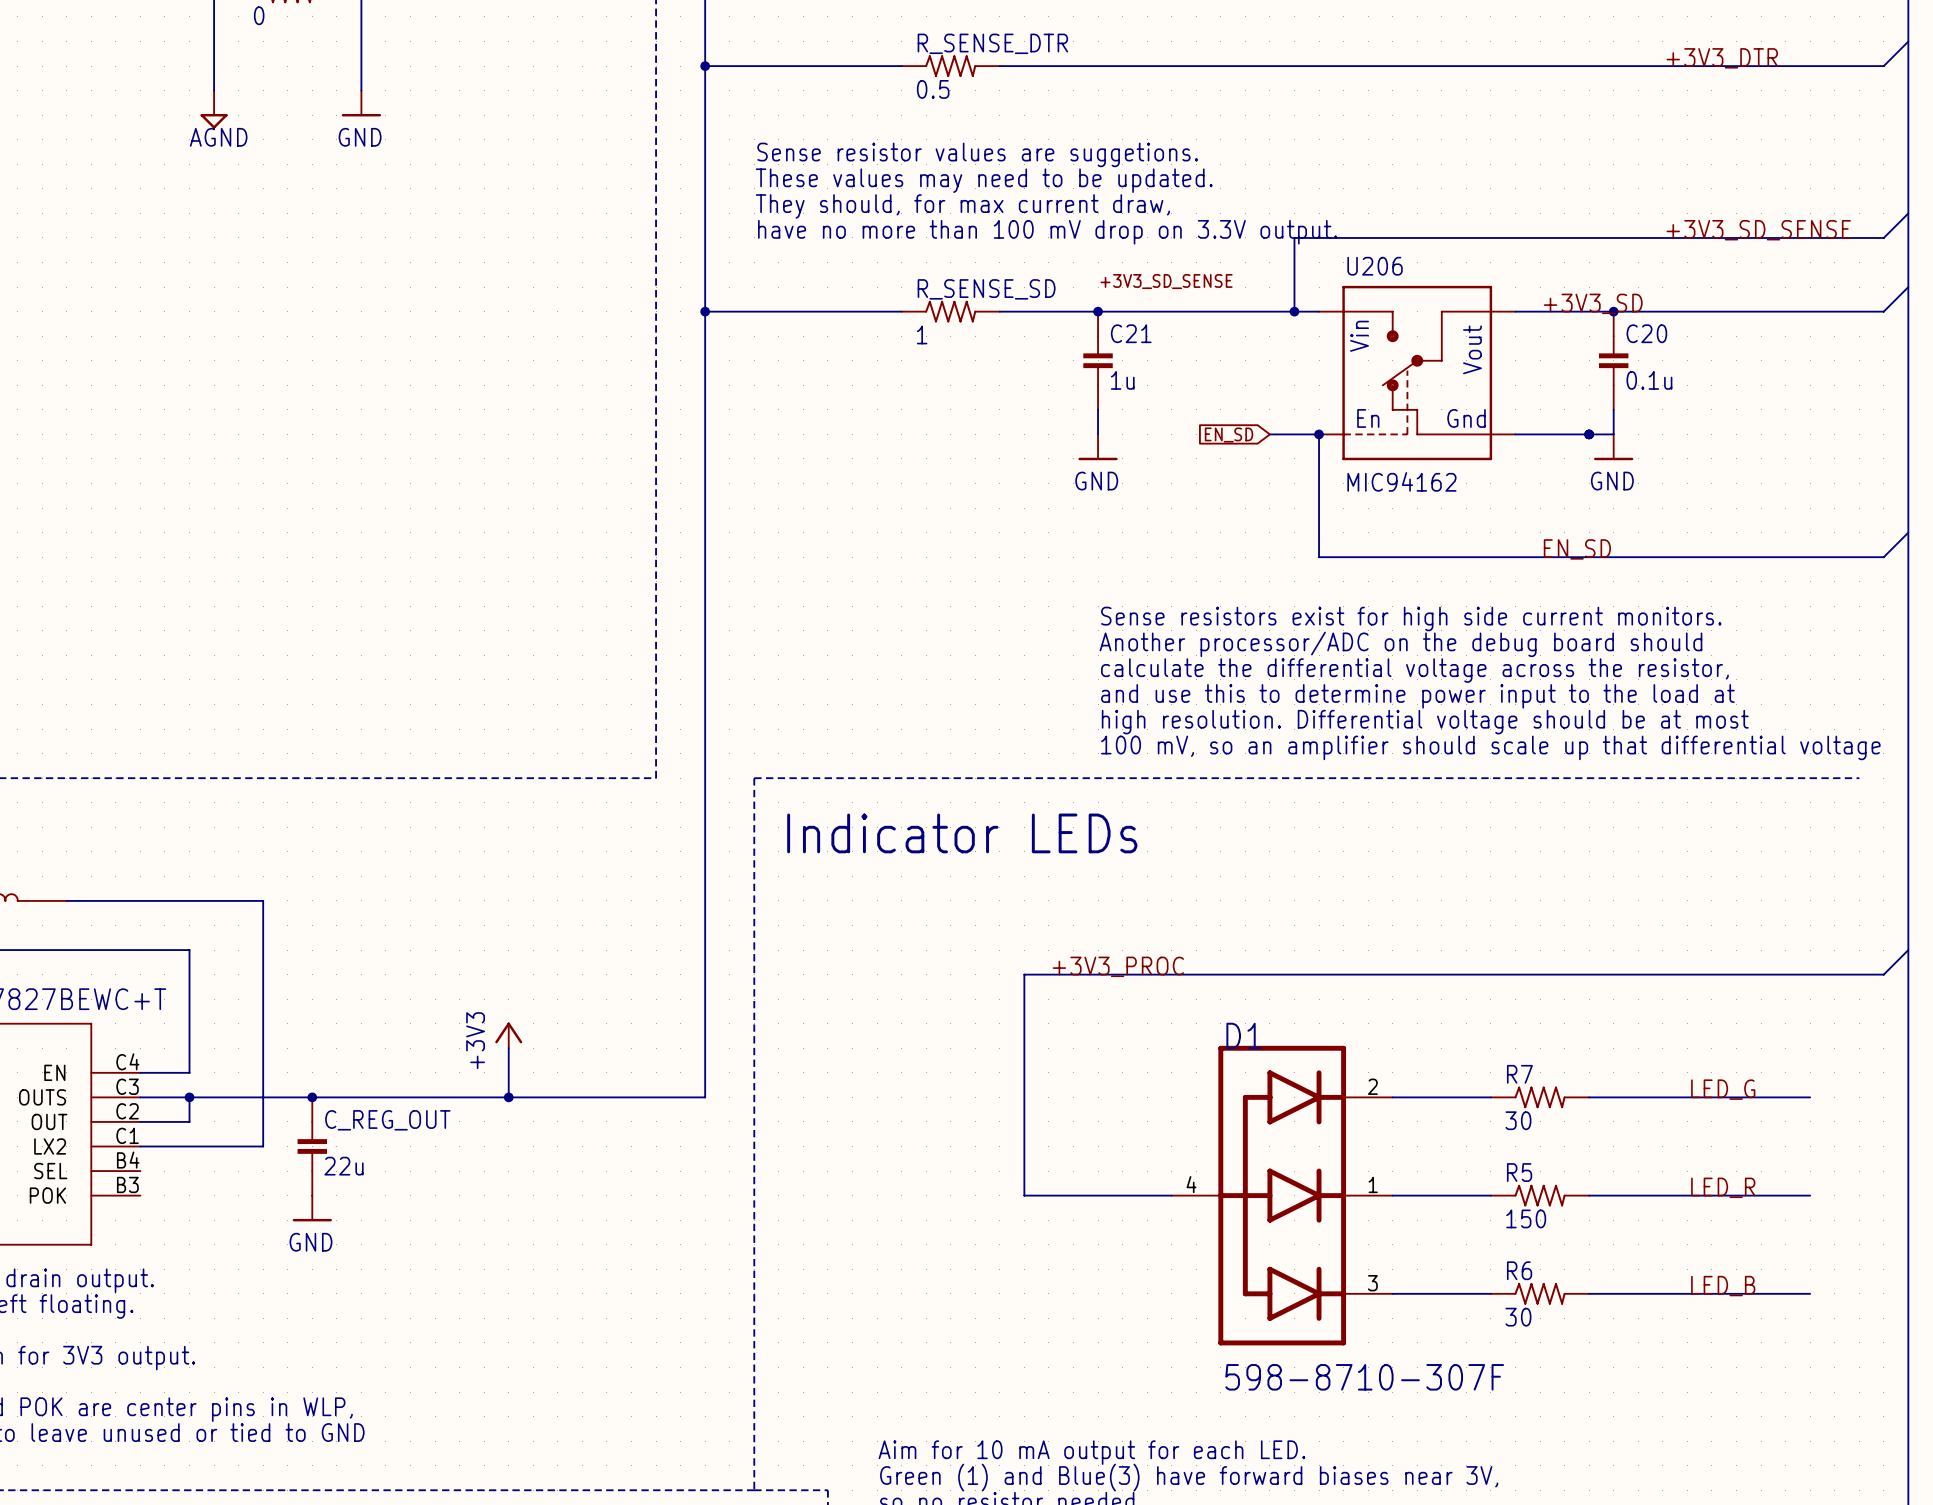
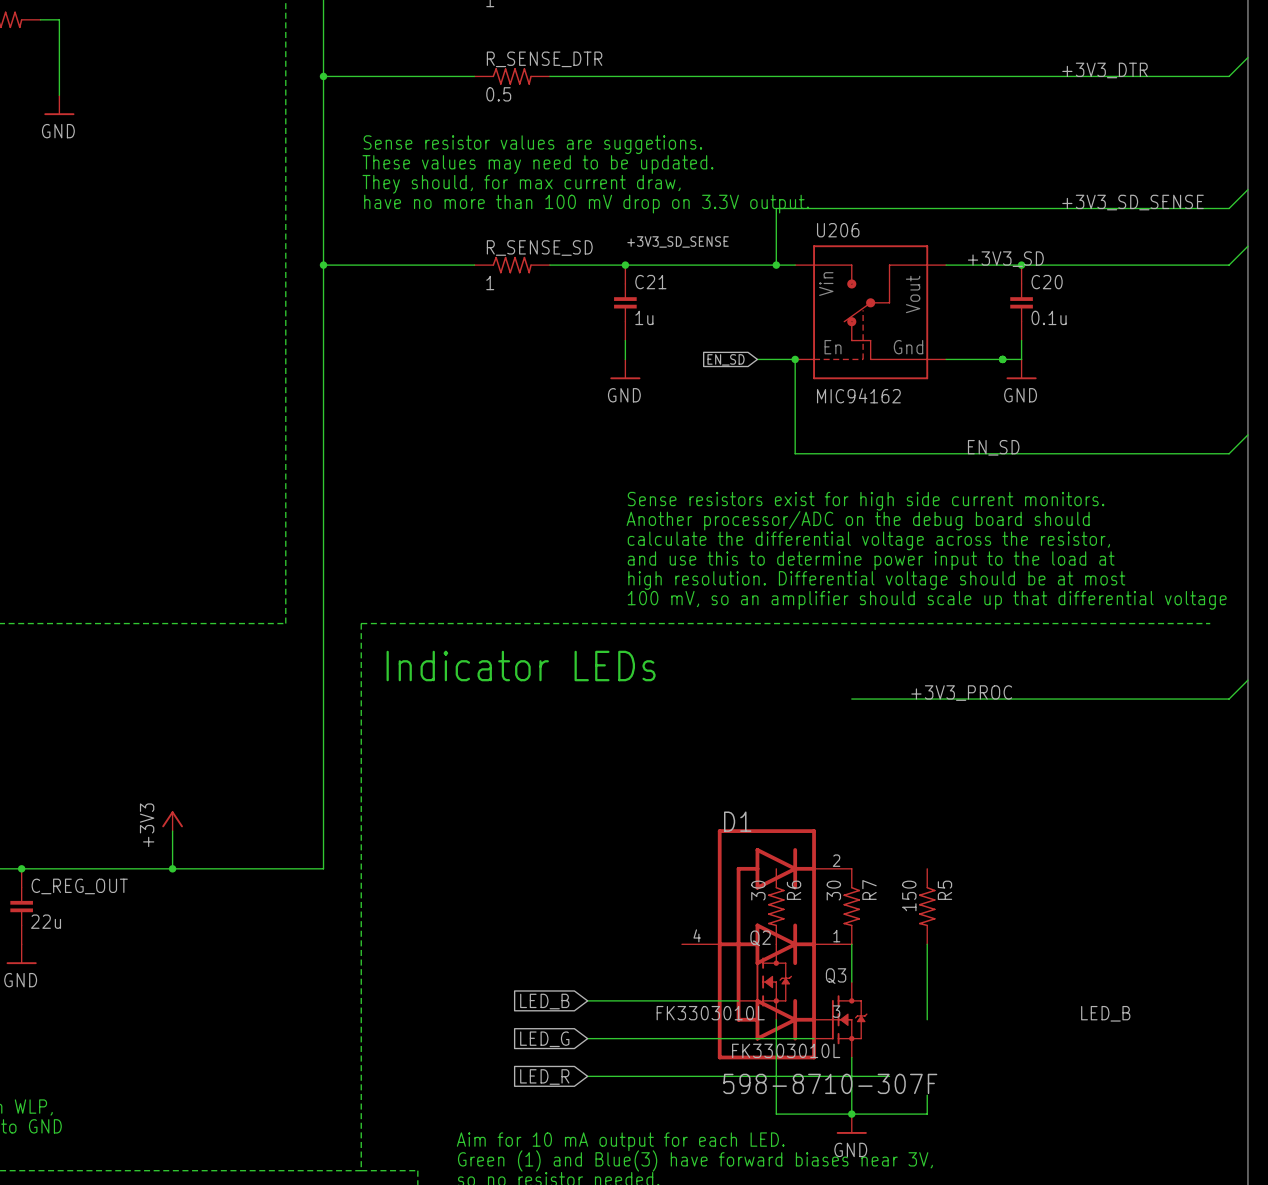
wire: none -> (1247, 680) (1229, 699) (851, 699)
label: none -> +3V3_PROC (961, 693)
wire: (1908, 950) (1883, 974) (1024, 974) (1024, 1195) (1171, 1195) -> none
label: +3V3_PROC (1118, 966) -> none
label: LED_G (1723, 1089) -> none
wire: (1392, 1097) (1490, 1097) -> none
R7 rotation: 0° (1540, 1097) -> 90° clockwise (851, 906)
R7 position: (1540, 1097) -> (851, 906)
wire: (1589, 1097) (1810, 1097) -> none
label: LED_R (1723, 1187) -> none
wire: (1392, 1195) (1490, 1195) -> (851, 944) (851, 982)
R5 rotation: 0° (1540, 1195) -> 90° clockwise (927, 906)
R5 position: (1540, 1195) -> (927, 906)
wire: (1589, 1195) (1810, 1195) -> none
Q2: none -> FK3303010L (765, 982)
wire: none -> (587, 1000) (738, 1000)
global label: none -> LED_B (544, 1001)
wire: none -> (776, 1019) (776, 1114) (927, 1114) (927, 1095)
Q3: none -> FK3303010L (840, 1019)
wire: (1392, 1293) (1490, 1293) -> (927, 944) (927, 1019)
R6 rotation: 0° (1540, 1293) -> 90° clockwise (776, 906)
R6 position: (1540, 1293) -> (776, 906)
wire: (1589, 1293) (1810, 1293) -> none
wire: none -> (587, 1038) (814, 1038)
global label: none -> LED_G (544, 1039)
wire: none -> (851, 1057) (851, 1114)
wire: none -> (587, 1076) (889, 1076)
global label: none -> LED_R (544, 1076)
junction: none -> (851, 1114)
power symbol: none -> GND (851, 1123)

